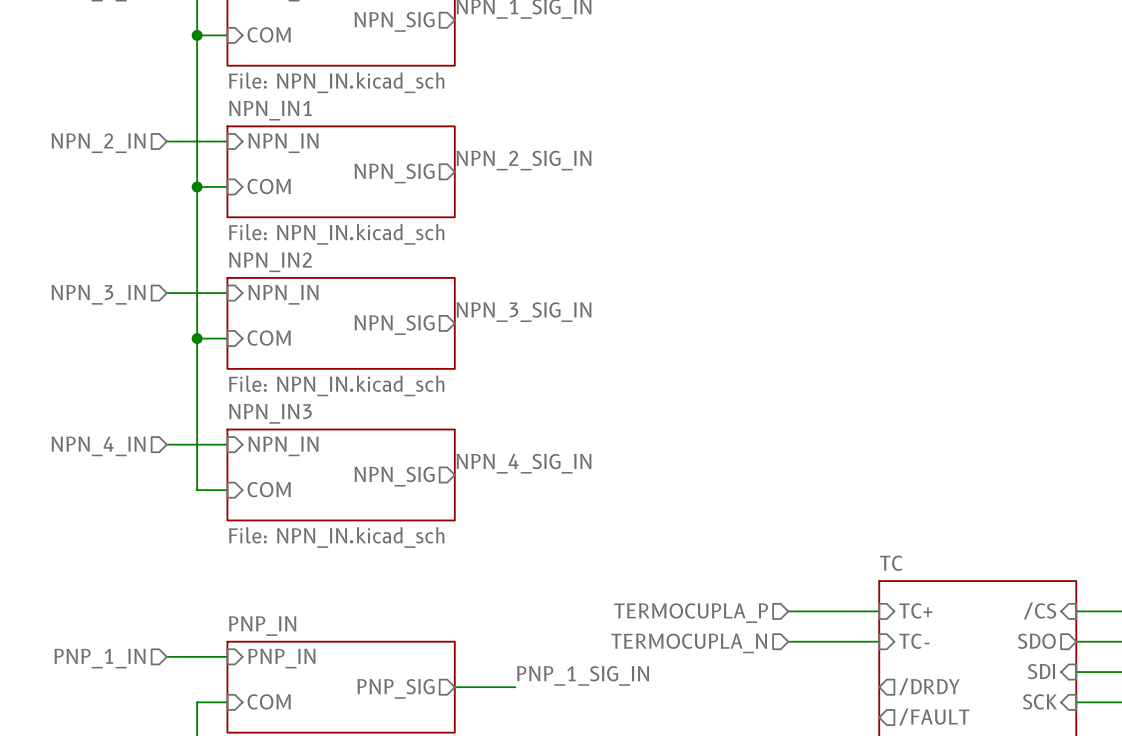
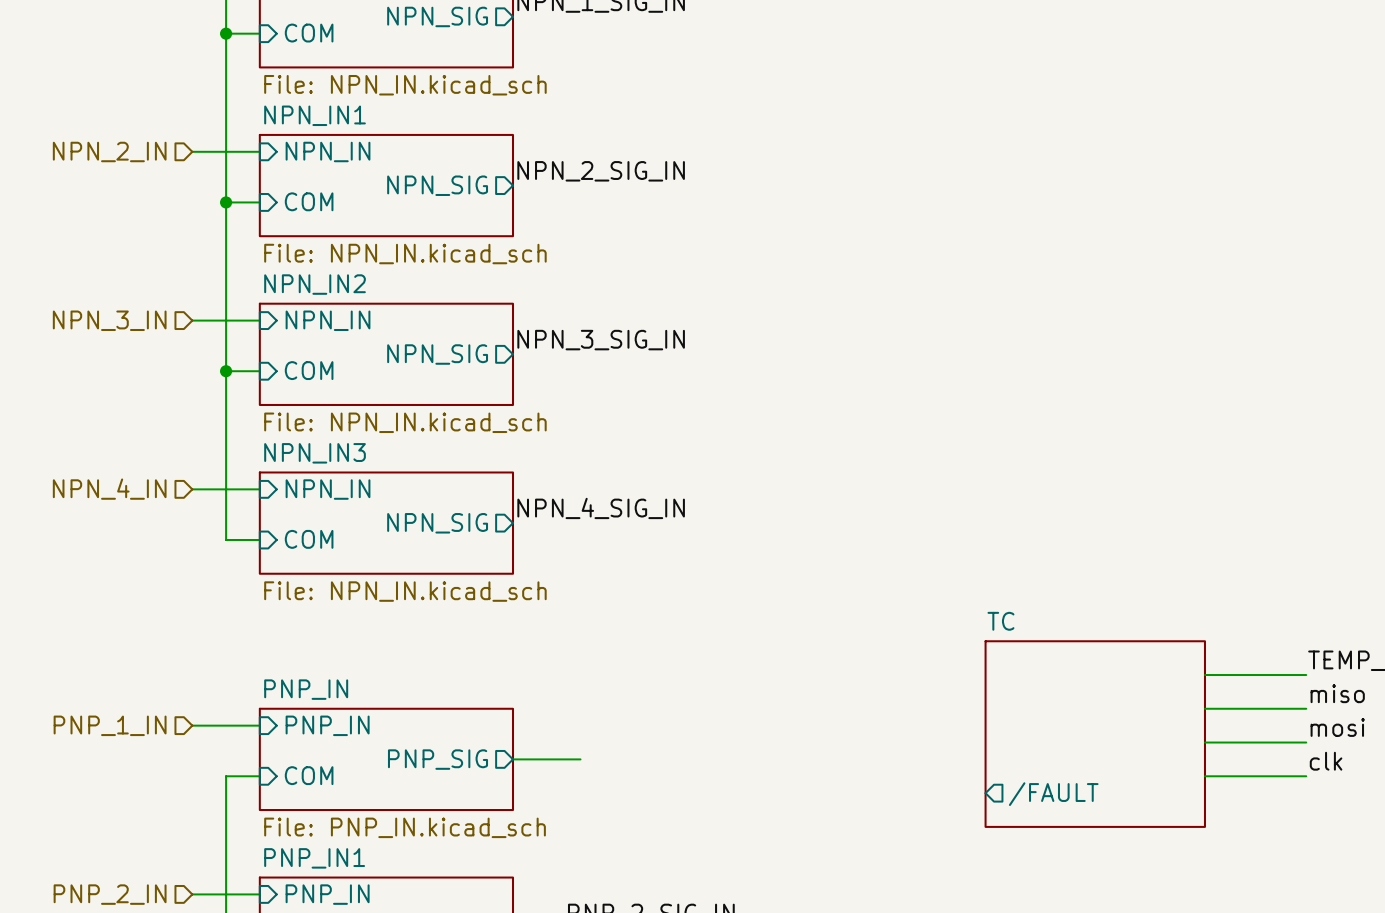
sheet pin: TC+ (915, 610) -> none
sheet pin: /CS (1040, 610) -> none
wire: (788, 611) (879, 611) -> none
hierarchical label: TERMOCUPLA_P (691, 613) -> none
wire: (788, 641) (879, 641) -> none
sheet pin: TC- (914, 641) -> none
sheet pin: SDO (1036, 641) -> none
hierarchical label: TERMOCUPLA_N (689, 643) -> none
sheet pin: SDI (1041, 671) -> none
label: PNP_1_SIG_IN (583, 675) -> none
sheet pin: /DRDY (929, 686) -> none
sheet pin: SCK (1039, 701) -> none

